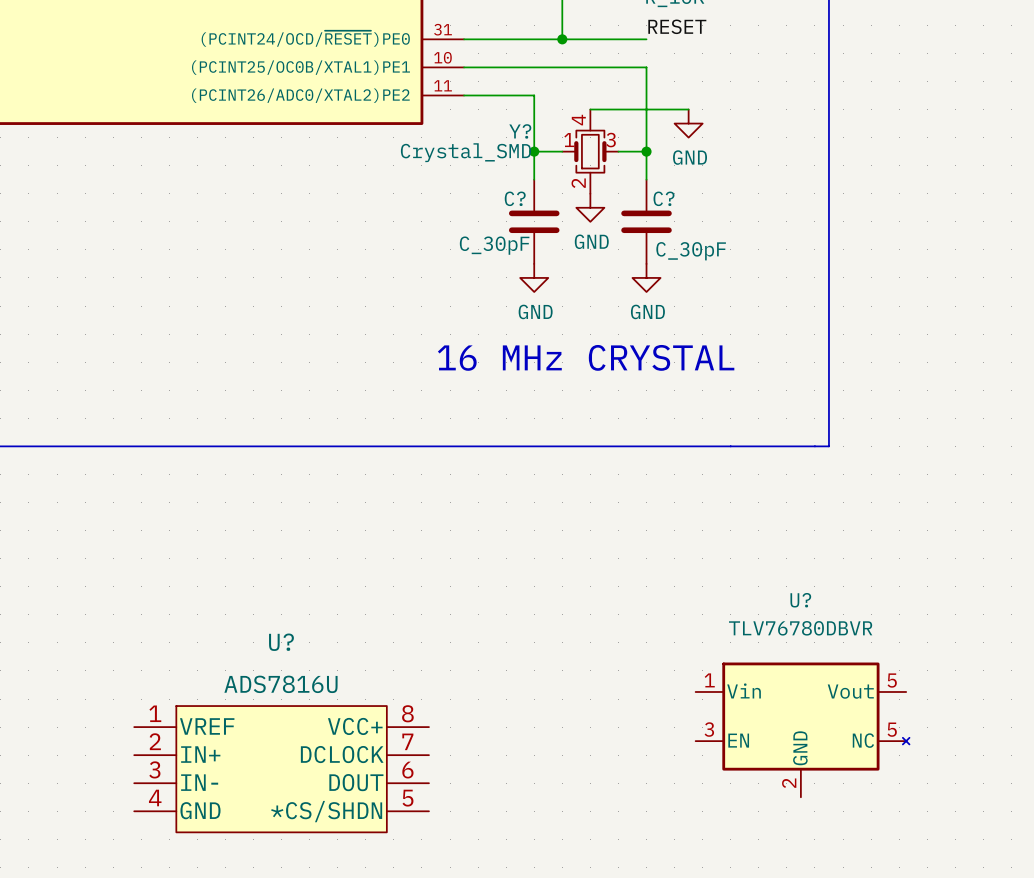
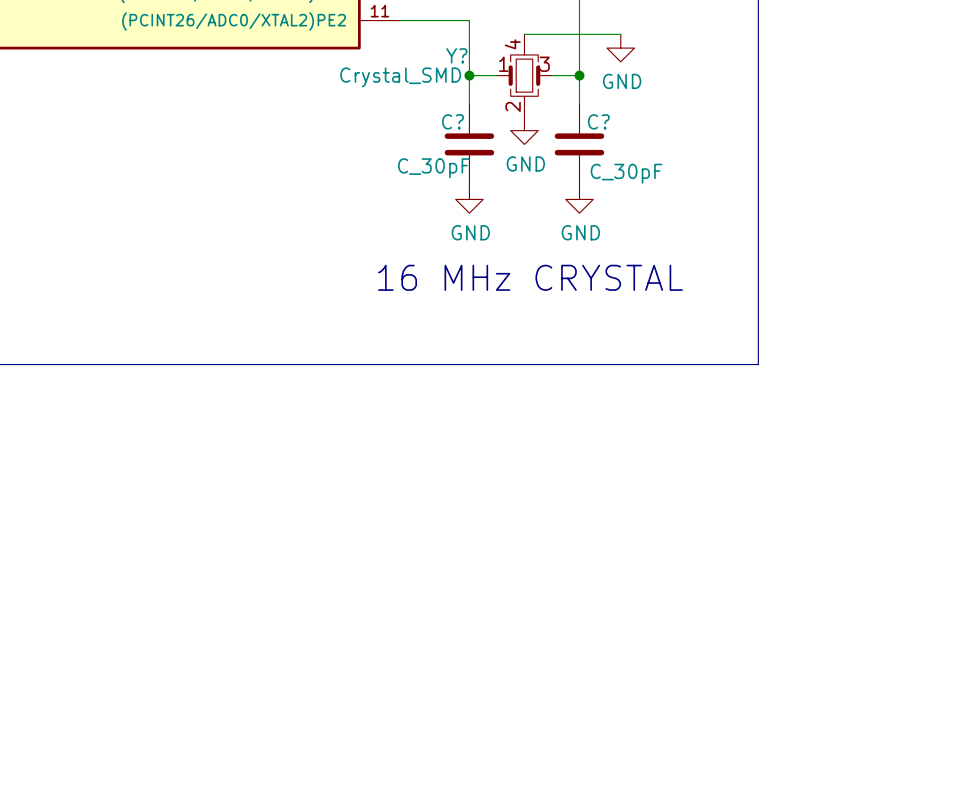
U?: TLV76780DBVR (802, 729) -> none
U?: ADS7816U (281, 769) -> none

